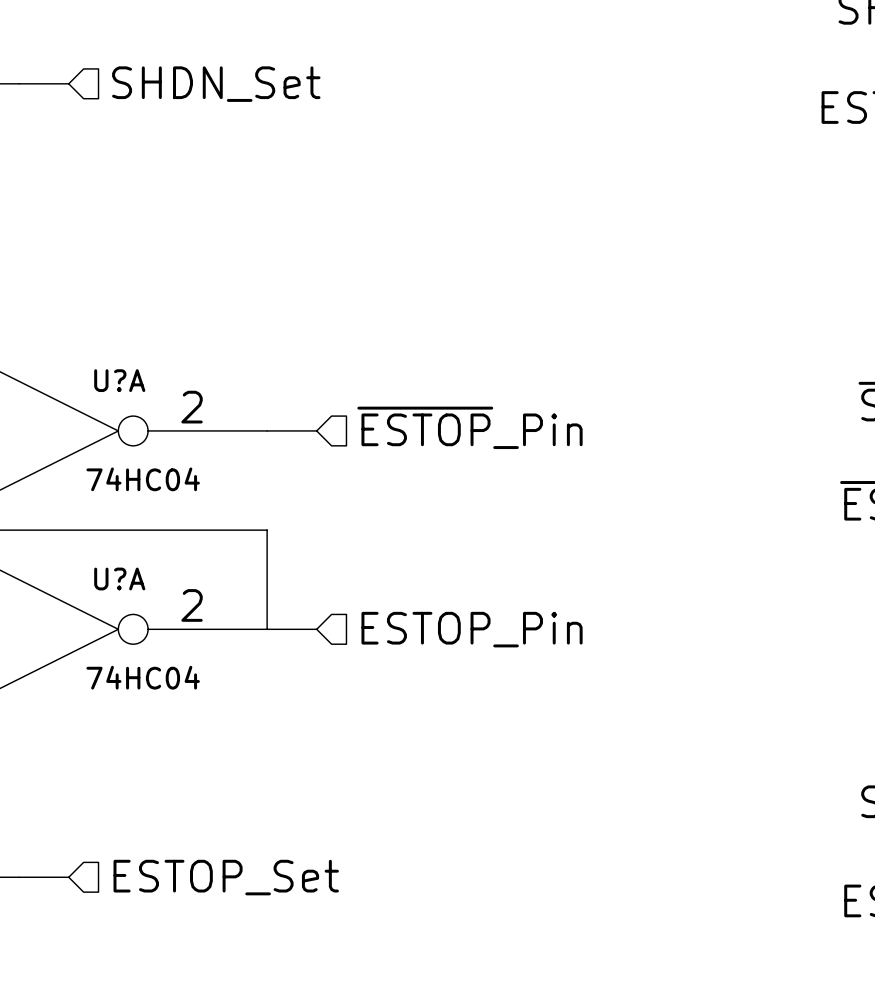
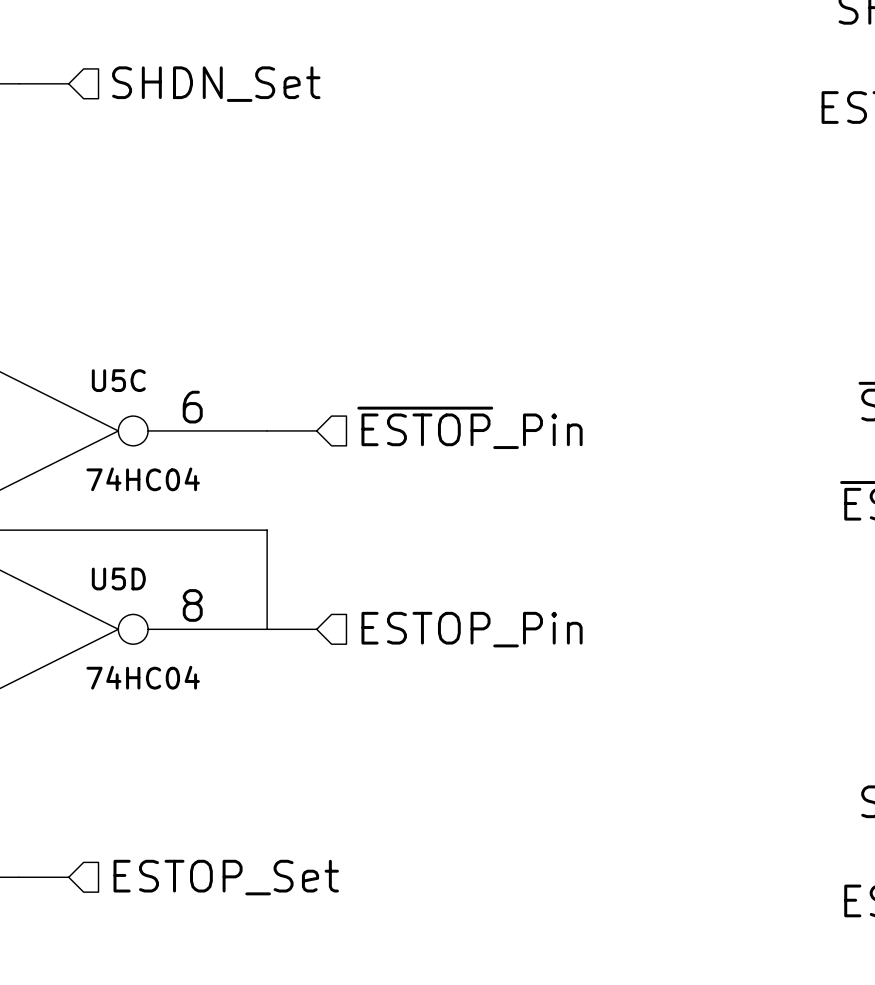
U?A name: U?A (119, 380) -> U5C (118, 380)
U?A pin number: 2 (192, 407) -> 6 (192, 407)
U?A name: U?A (119, 578) -> U5D (118, 578)
U?A pin number: 2 (192, 605) -> 8 (192, 605)

